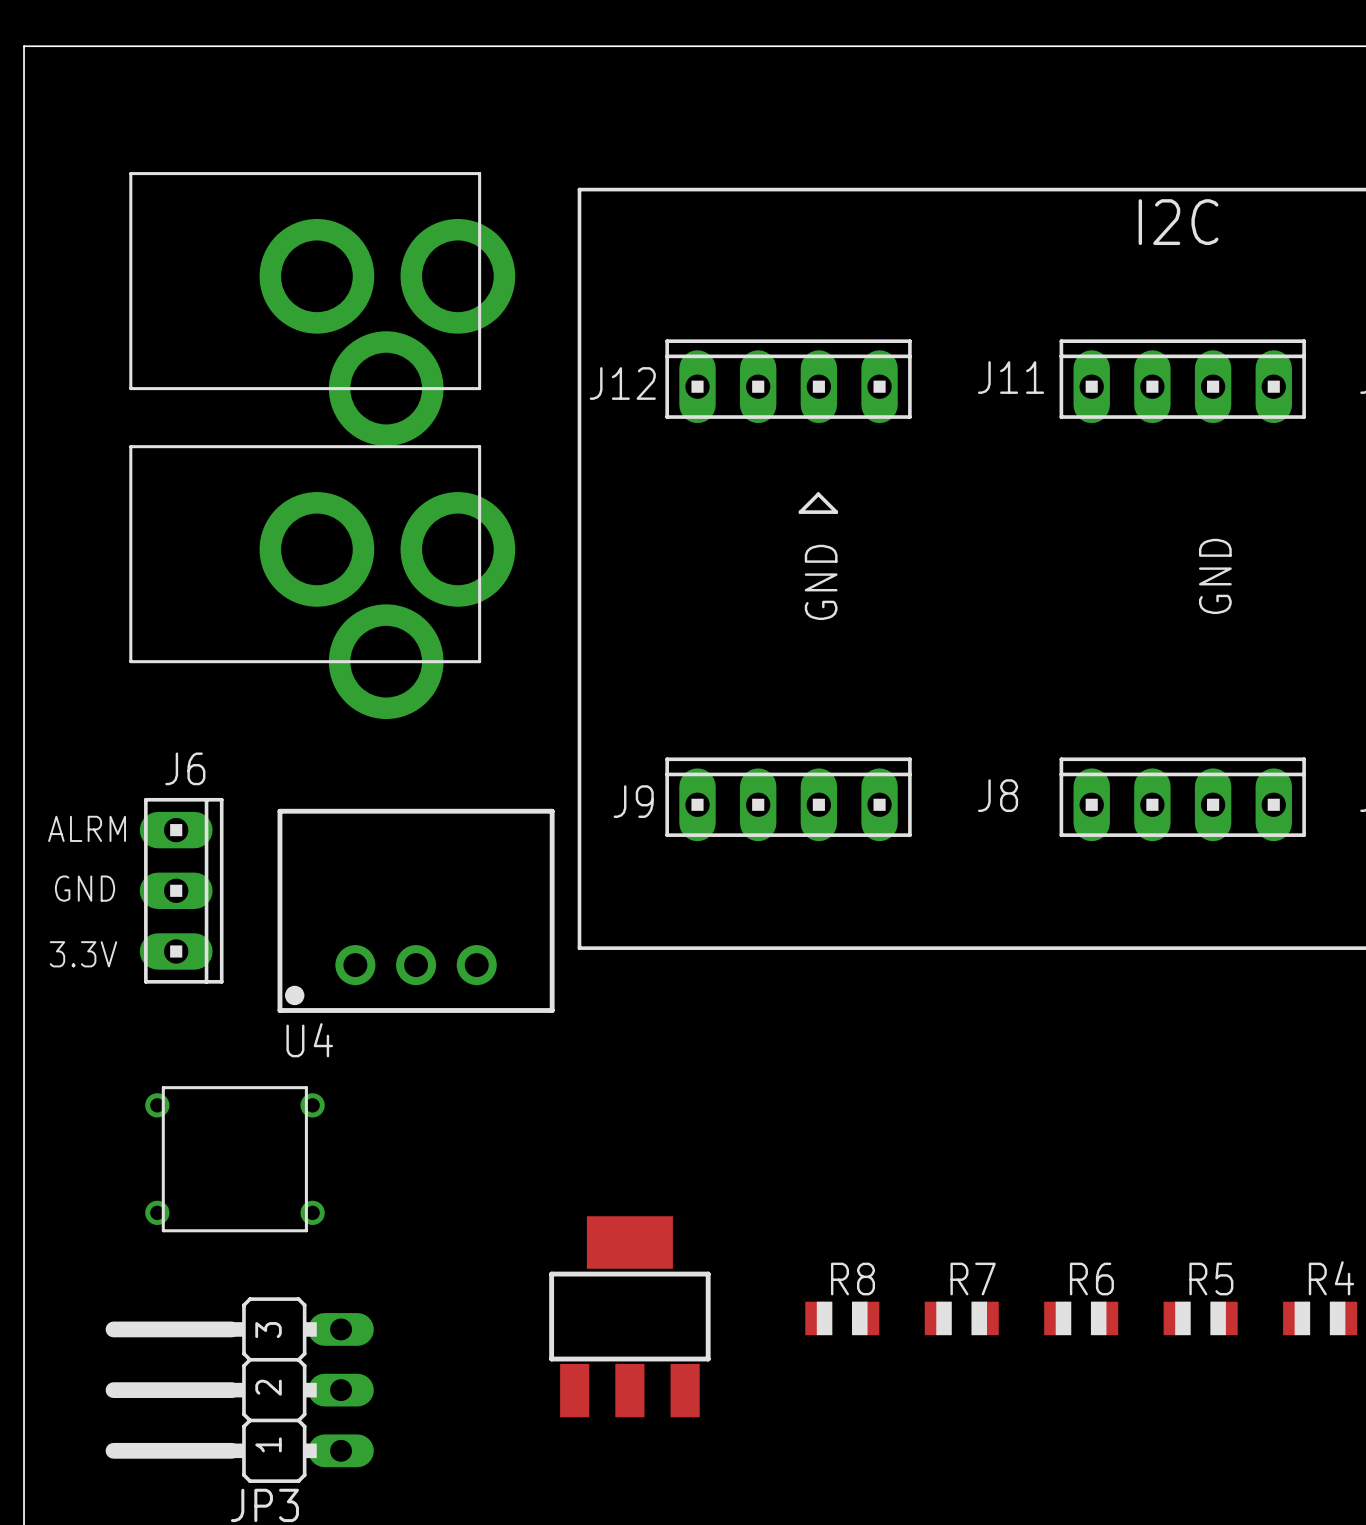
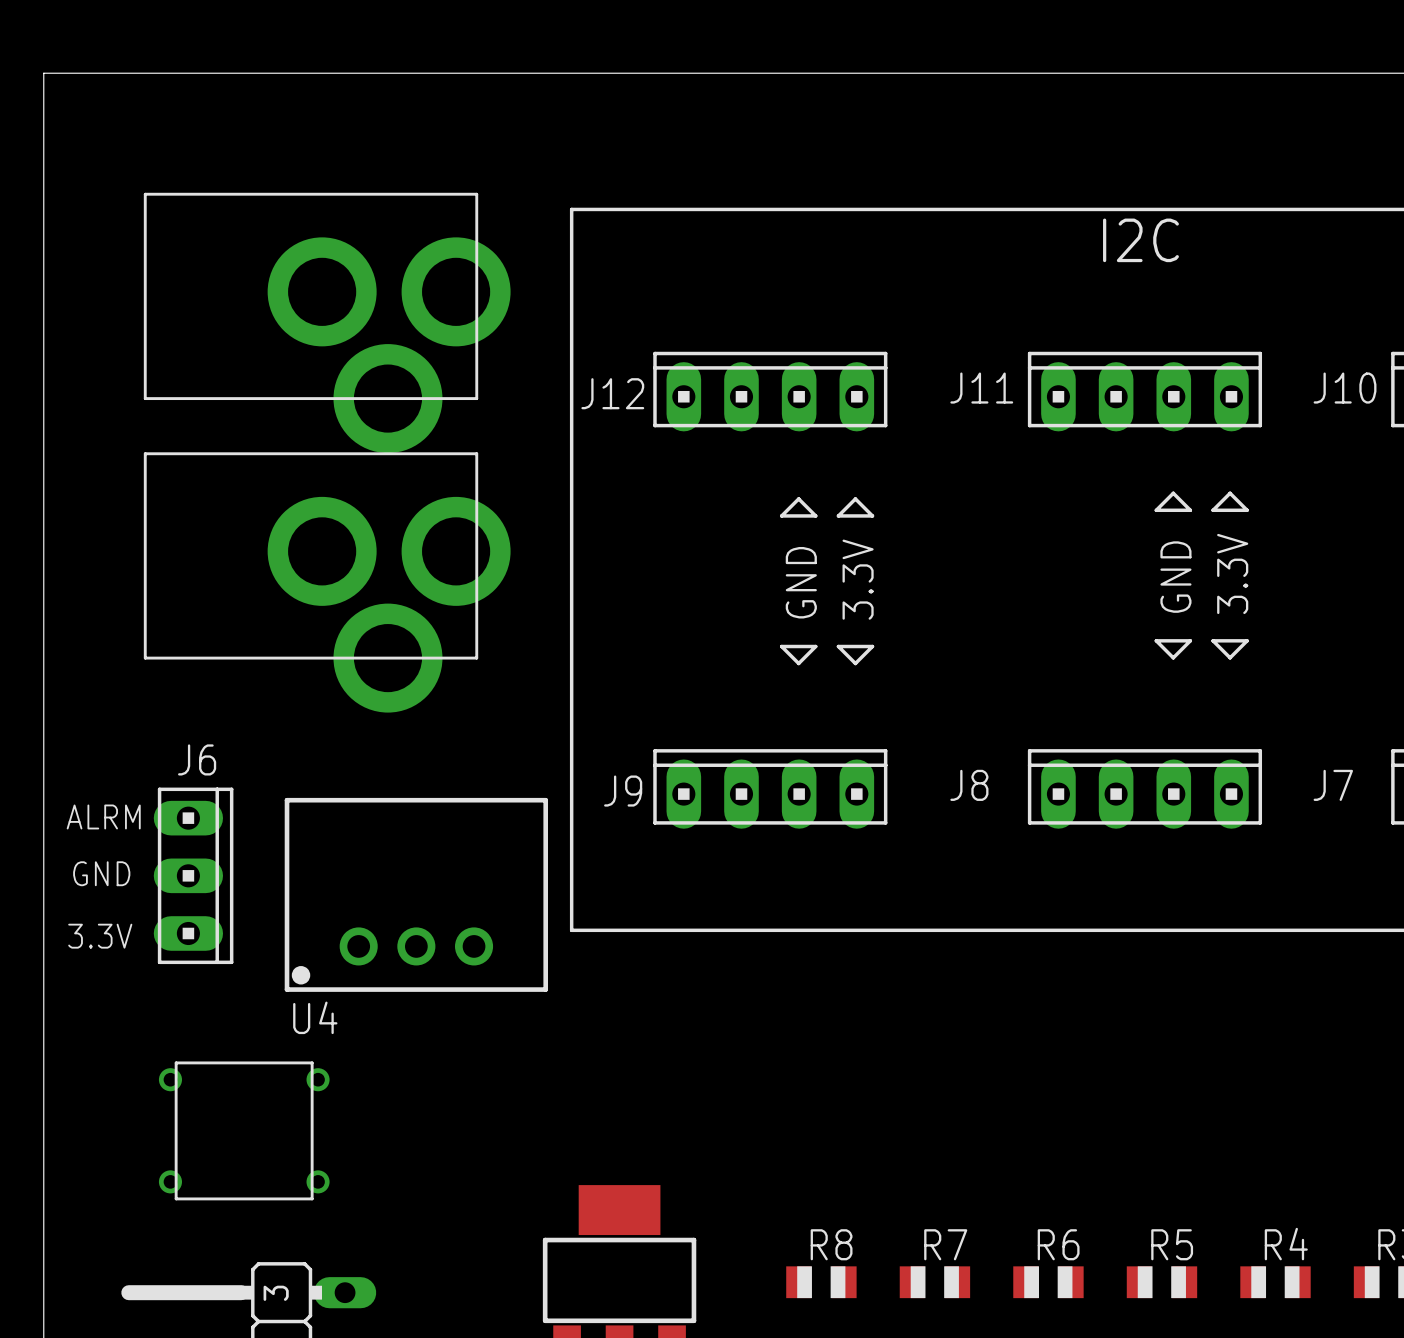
line: none -> (1173, 493) (1156, 510) (1190, 510) (1173, 493)
line: none -> (1230, 493) (1213, 510) (1247, 510) (1230, 493)
line: none -> (855, 498) (838, 515) (872, 515) (855, 498)
text: none -> 3.3V (1232, 573)
text: none -> 3.3V (858, 579)
line: none -> (1156, 640) (1173, 657) (1190, 640) (1156, 640)
line: none -> (1213, 640) (1247, 640) (1230, 657) (1213, 640)
line: none -> (781, 646) (798, 663) (815, 646) (781, 646)
line: none -> (838, 646) (872, 646) (855, 663) (838, 646)

